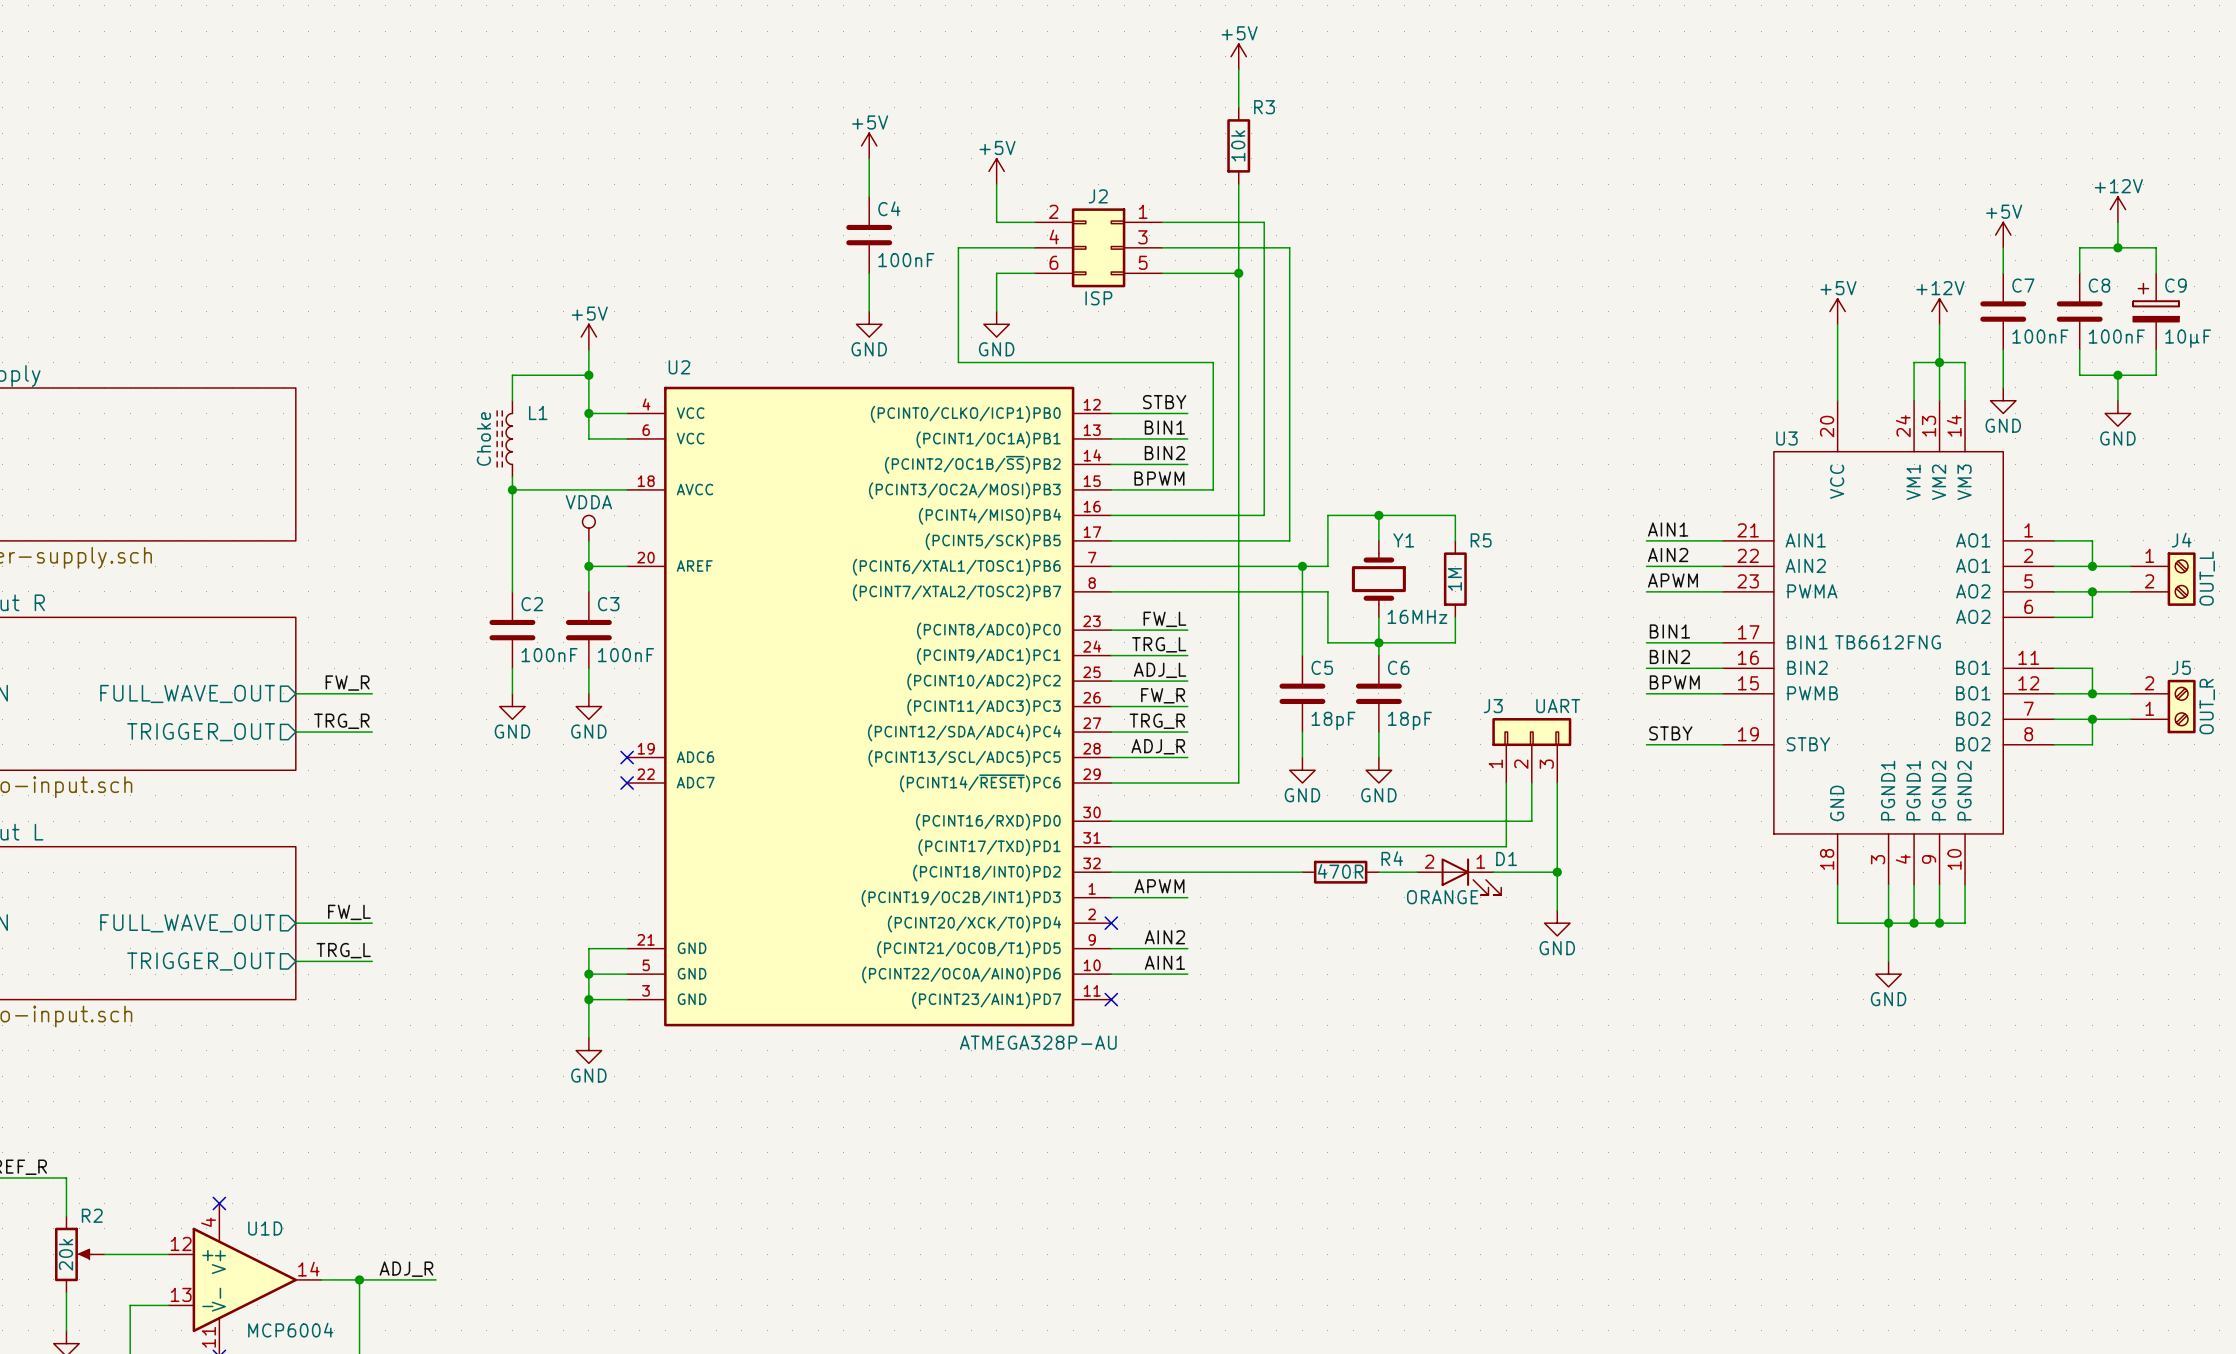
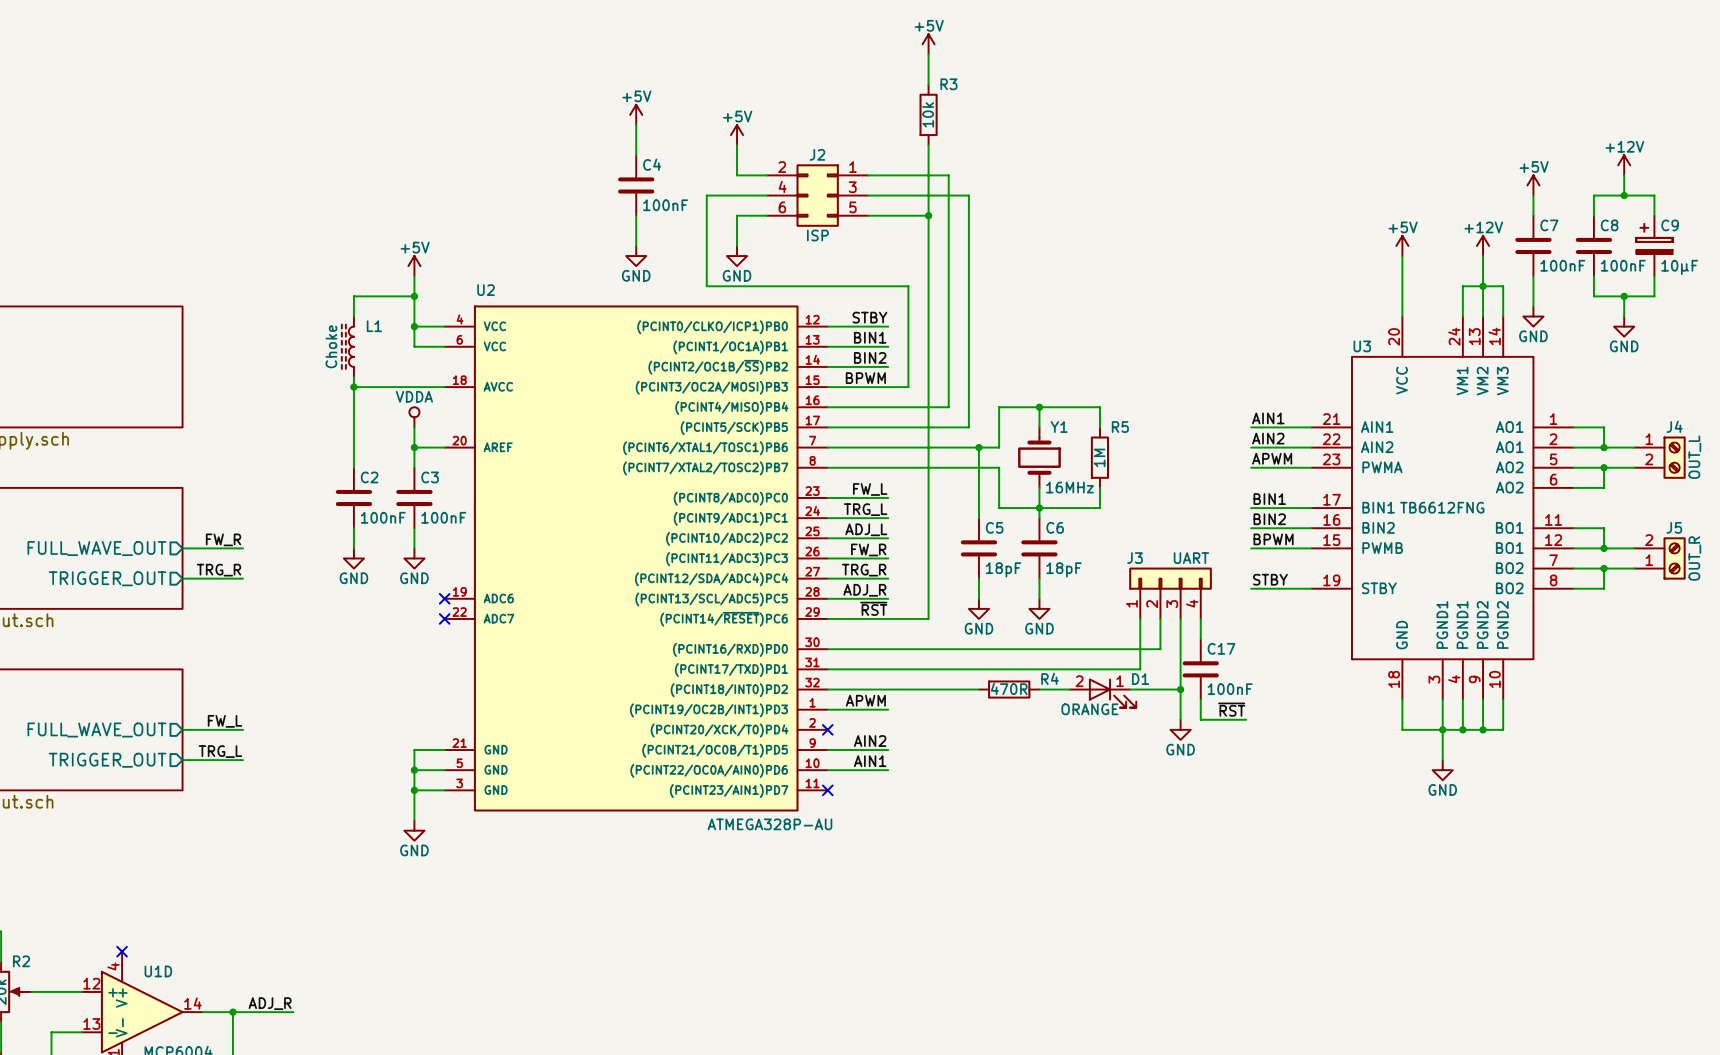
J3 symbol: [1492, 718, 1572, 784] -> [1129, 567, 1212, 619]
label: none -> ~{RST} (873, 608)
wire: none -> (1200, 618) (1200, 639)
C17: none -> 100nF (1200, 669)
wire: none -> (1200, 699) (1200, 719) (1246, 719)
label: none -> ~{RST} (1231, 709)

